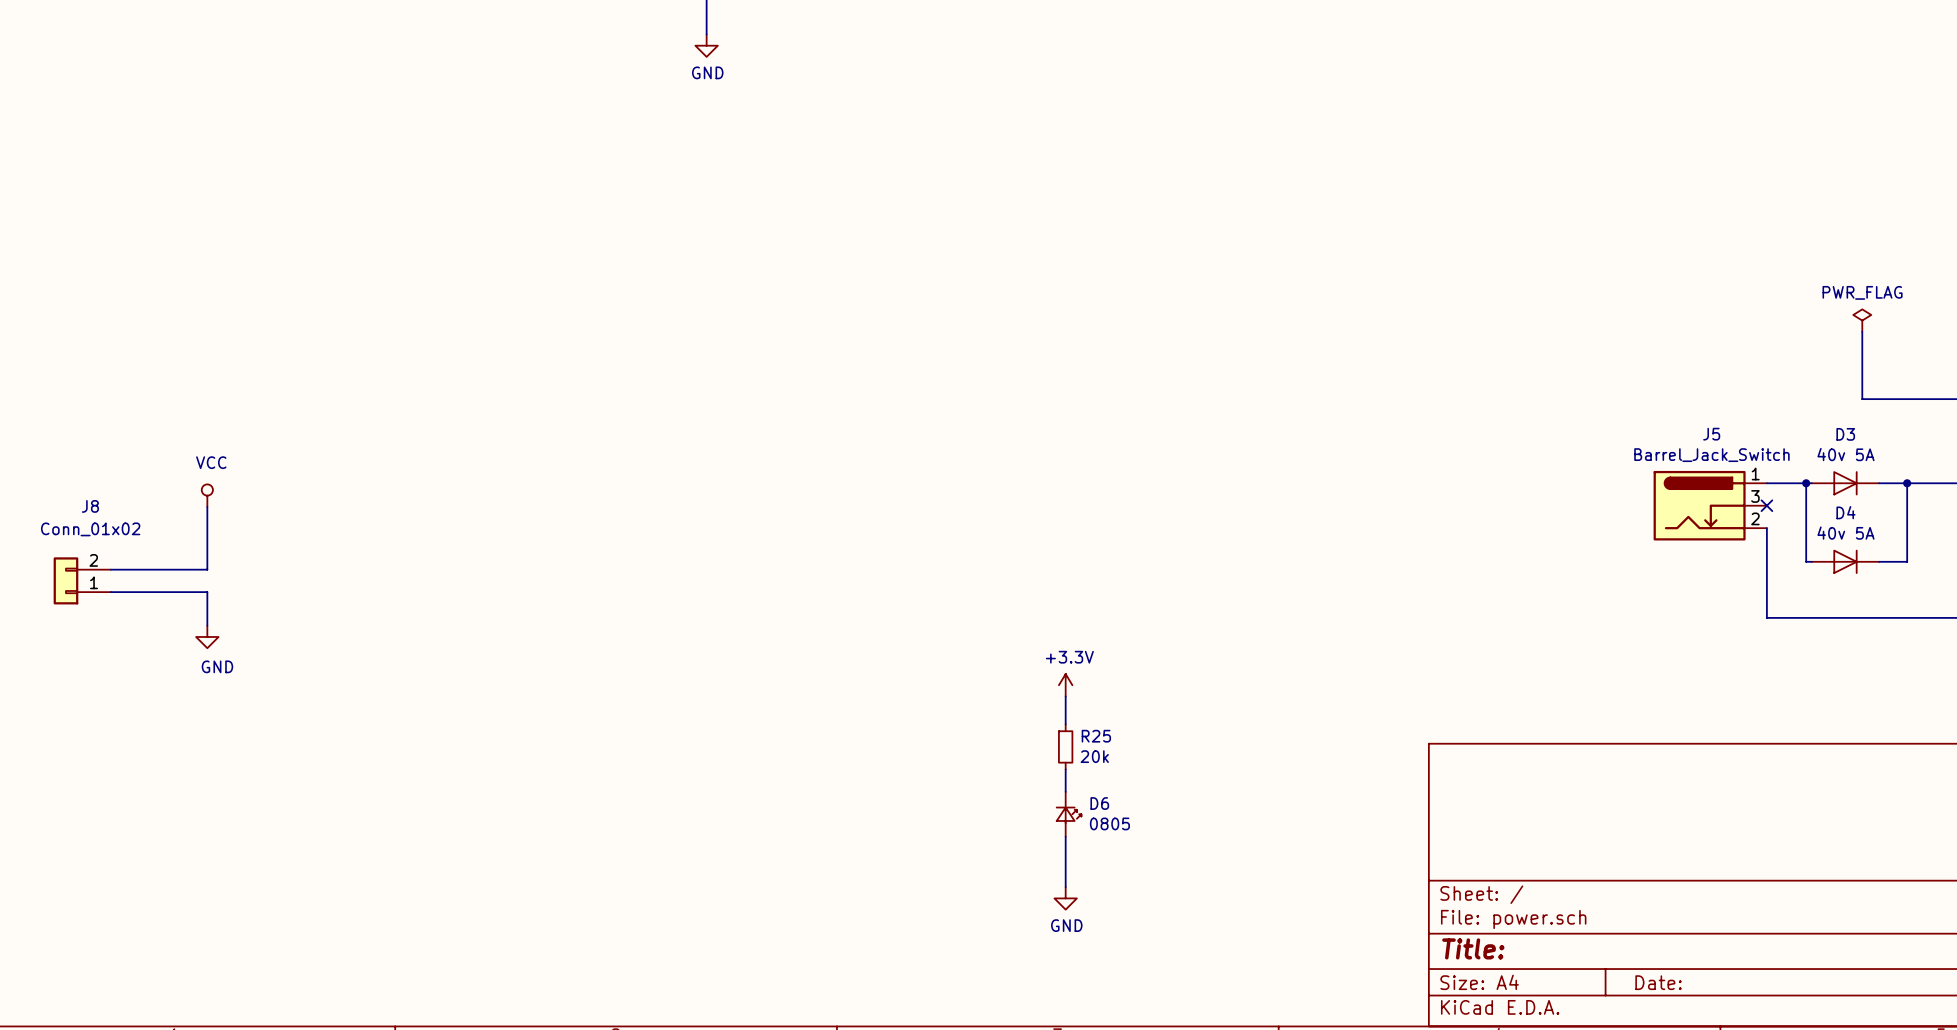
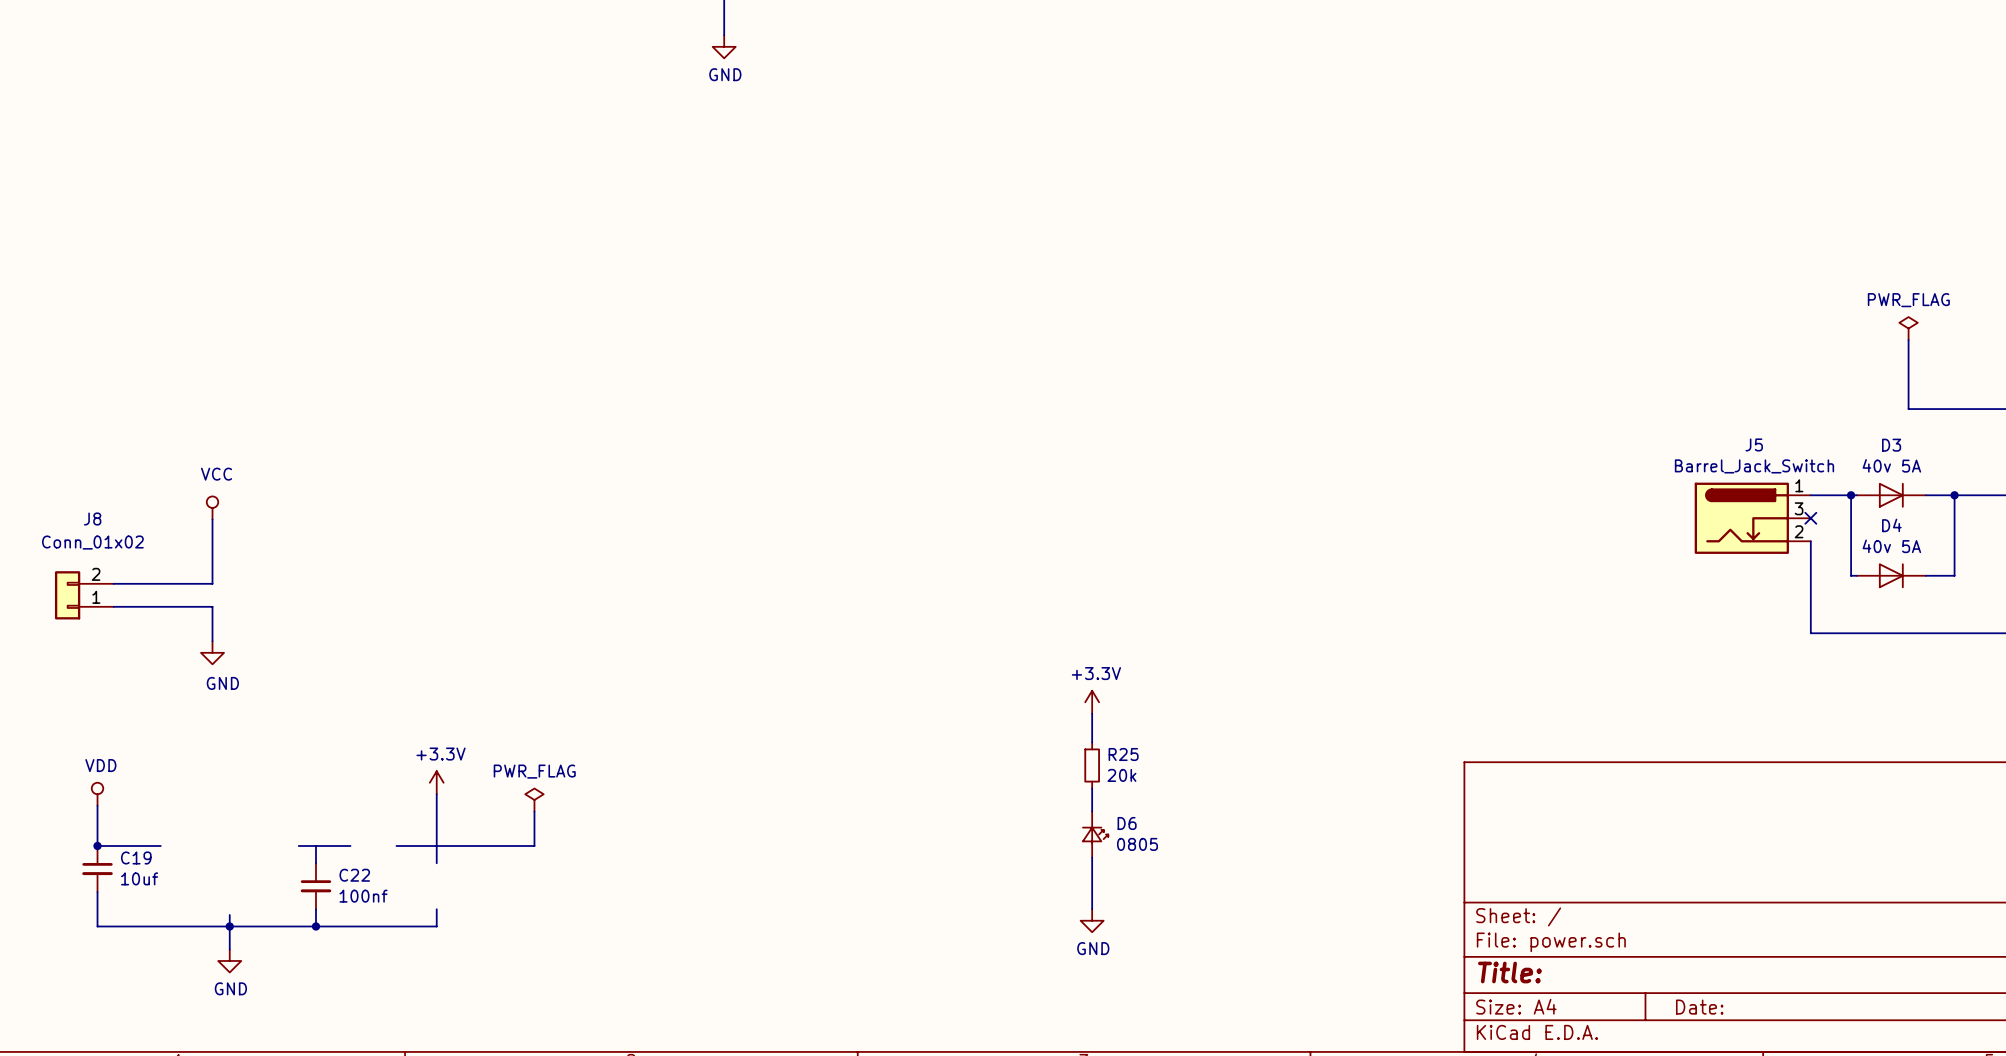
power symbol: none -> +3.3V (436, 782)
power symbol: none -> VDD (97, 794)
wire: none -> (436, 794) (436, 863)
power symbol: none -> PWR_FLAG (534, 800)
wire: none -> (97, 805) (97, 845) (160, 845)
wire: none -> (534, 811) (534, 845) (396, 845)
junction: none -> (97, 845)
wire: none -> (298, 845) (350, 845)
wire: none -> (315, 845) (315, 863)
C19: none -> 10uf (97, 868)
C22: none -> 100nf (315, 886)
wire: none -> (97, 891) (97, 926) (436, 926) (436, 909)
wire: none -> (315, 909) (315, 926)
wire: none -> (229, 914) (229, 949)
junction: none -> (229, 926)
junction: none -> (315, 926)
power symbol: none -> GND (229, 960)

